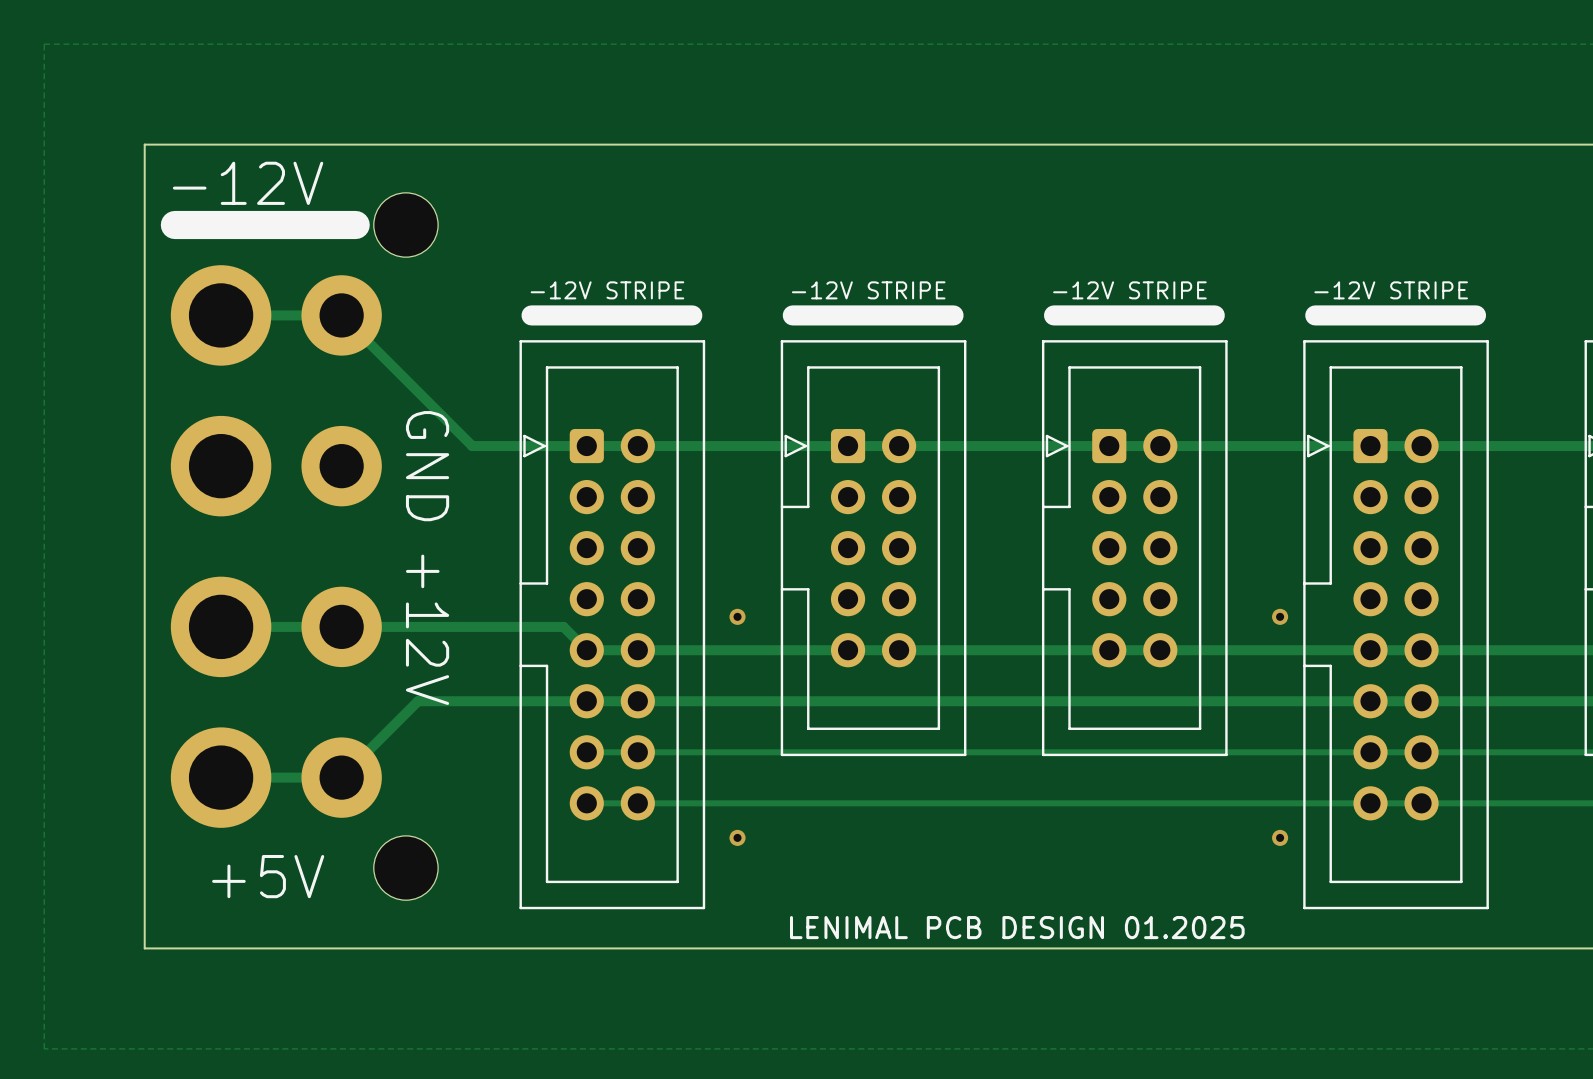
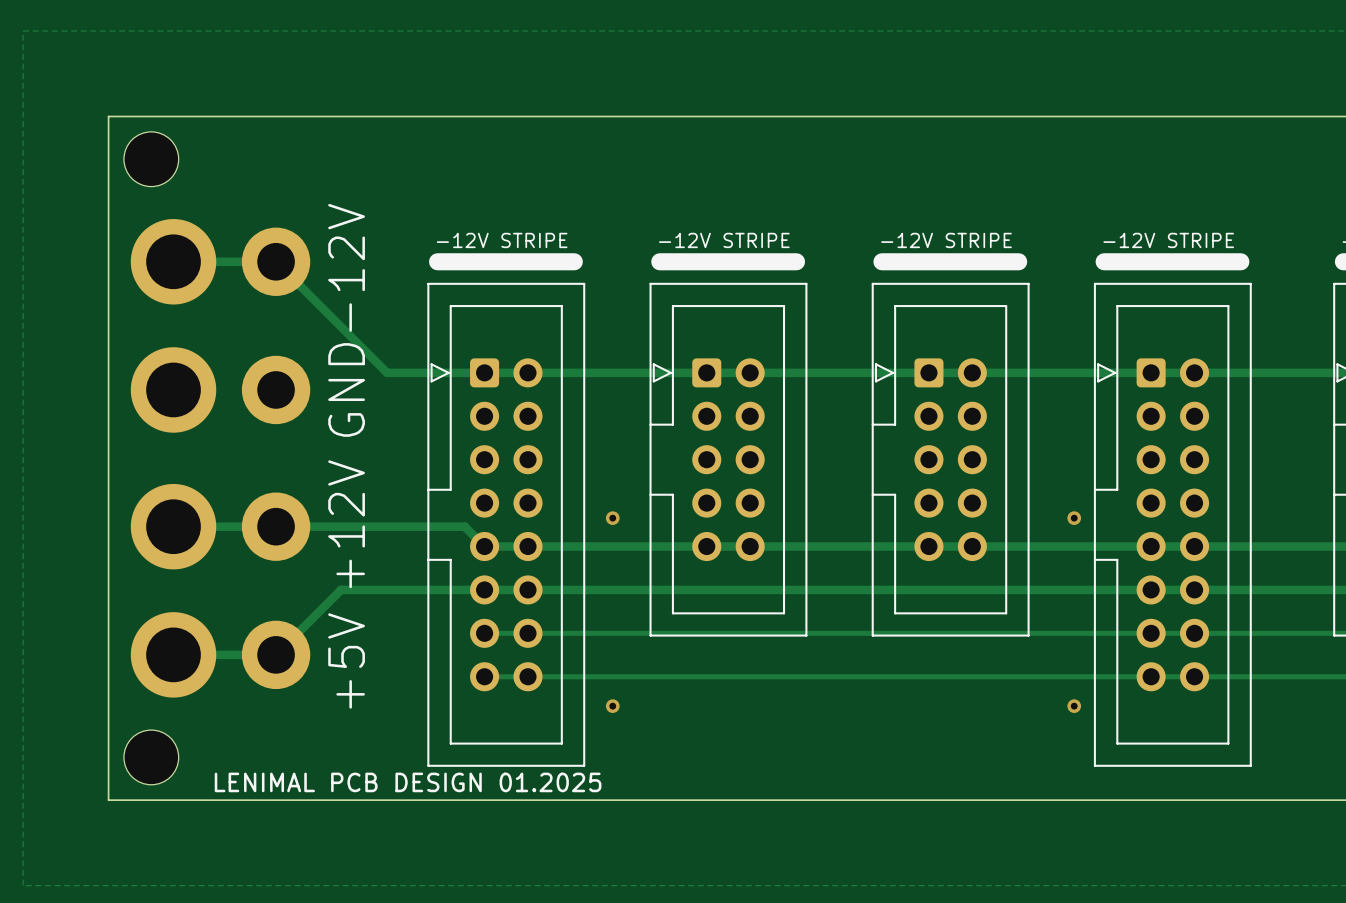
text rotation: 0° (248, 183) -> 90° counterclockwise (346, 267)
text position: -12V (248, 183) -> -12V (346, 267)
line: (174, 225) (355, 225) -> none
part position: (405, 225) -> (151, 159)
text rotation: 0° (427, 466) -> 180° (346, 389)
text rotation: 0° (427, 629) -> 180° (346, 524)
part position: (405, 868) -> (151, 757)
text rotation: 0° (268, 876) -> 90° counterclockwise (346, 660)
text position: +5V (268, 876) -> +5V (346, 660)
text: none -> LENIMAL PCB DESIGN 01.2025 (408, 782)
text: LENIMAL PCB DESIGN 01.2025 (1017, 927) -> none

